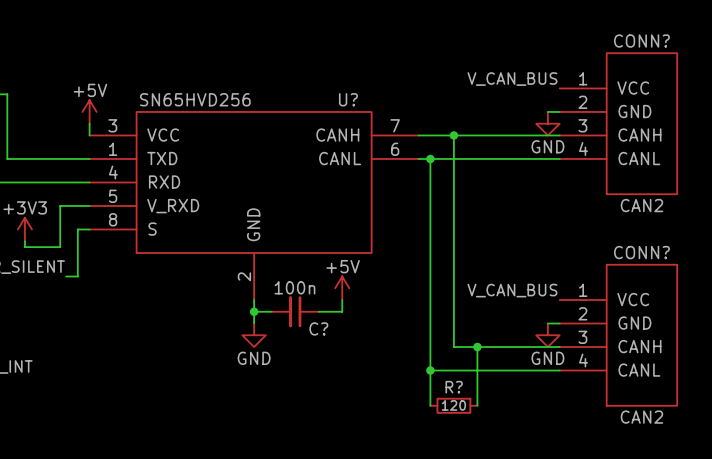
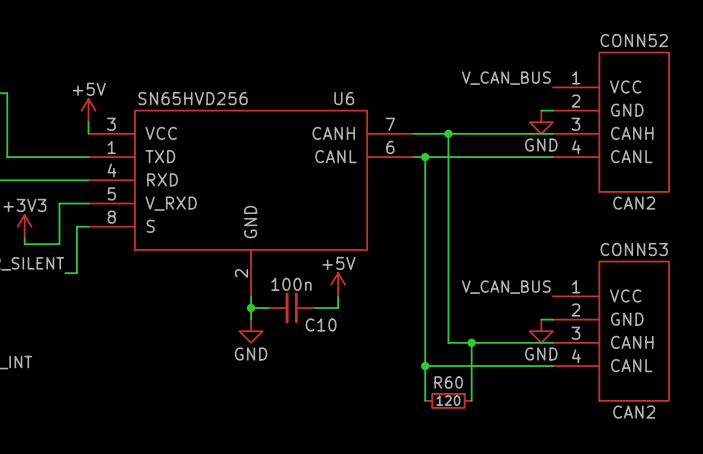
CONN? name: CONN? (641, 41) -> CONN52 (634, 40)
U? name: U? (348, 99) -> U6 (344, 98)
CONN? name: CONN? (641, 252) -> CONN53 (634, 249)
C? name: C? (318, 328) -> C10 (321, 324)
R? name: R? (454, 387) -> R60 (448, 382)

